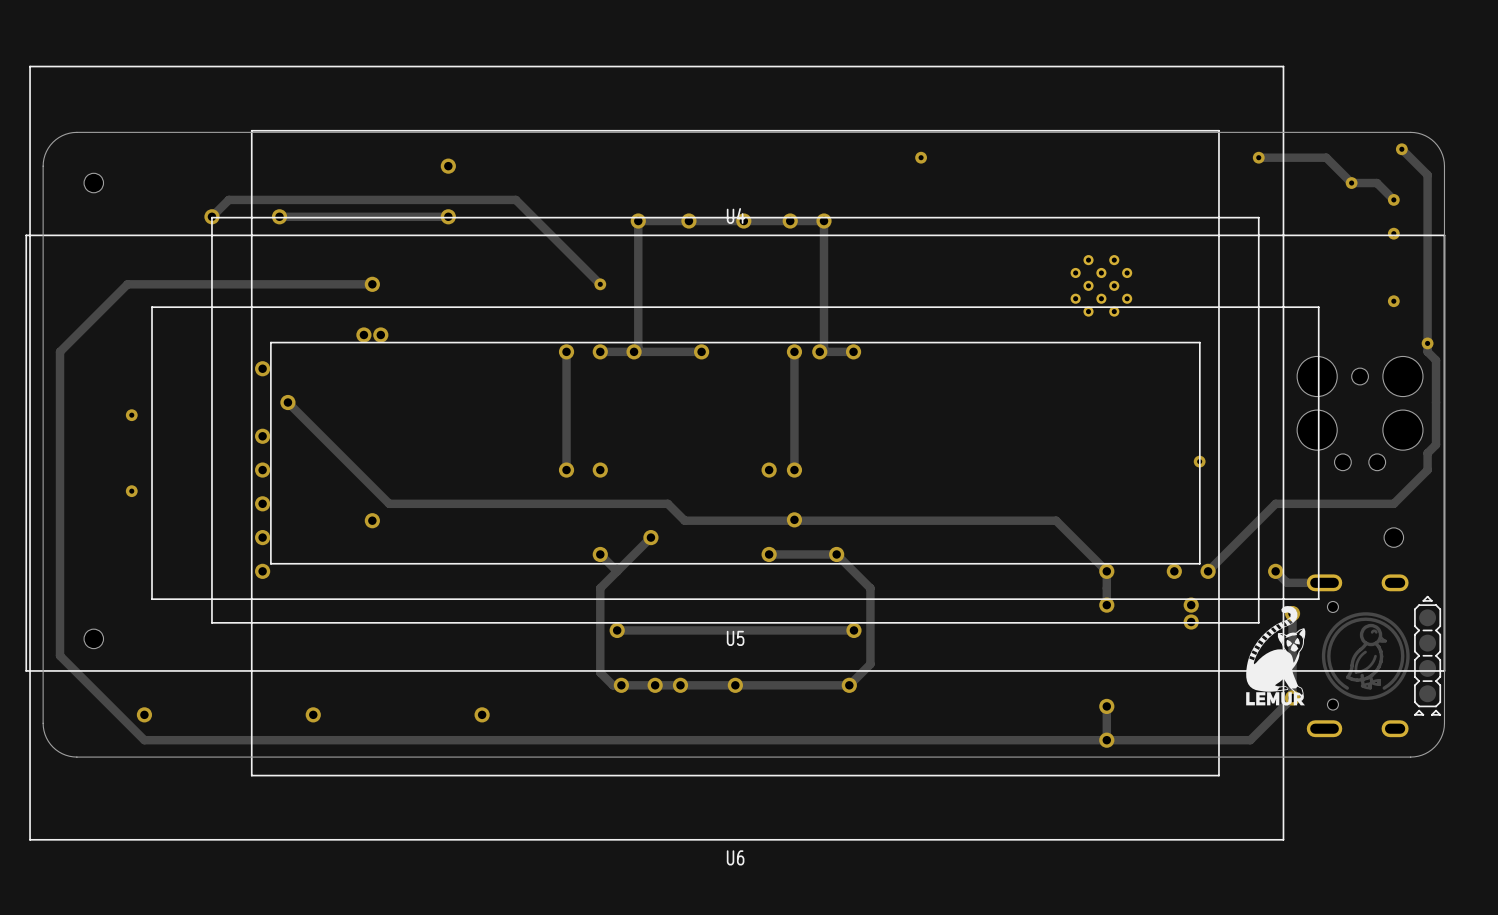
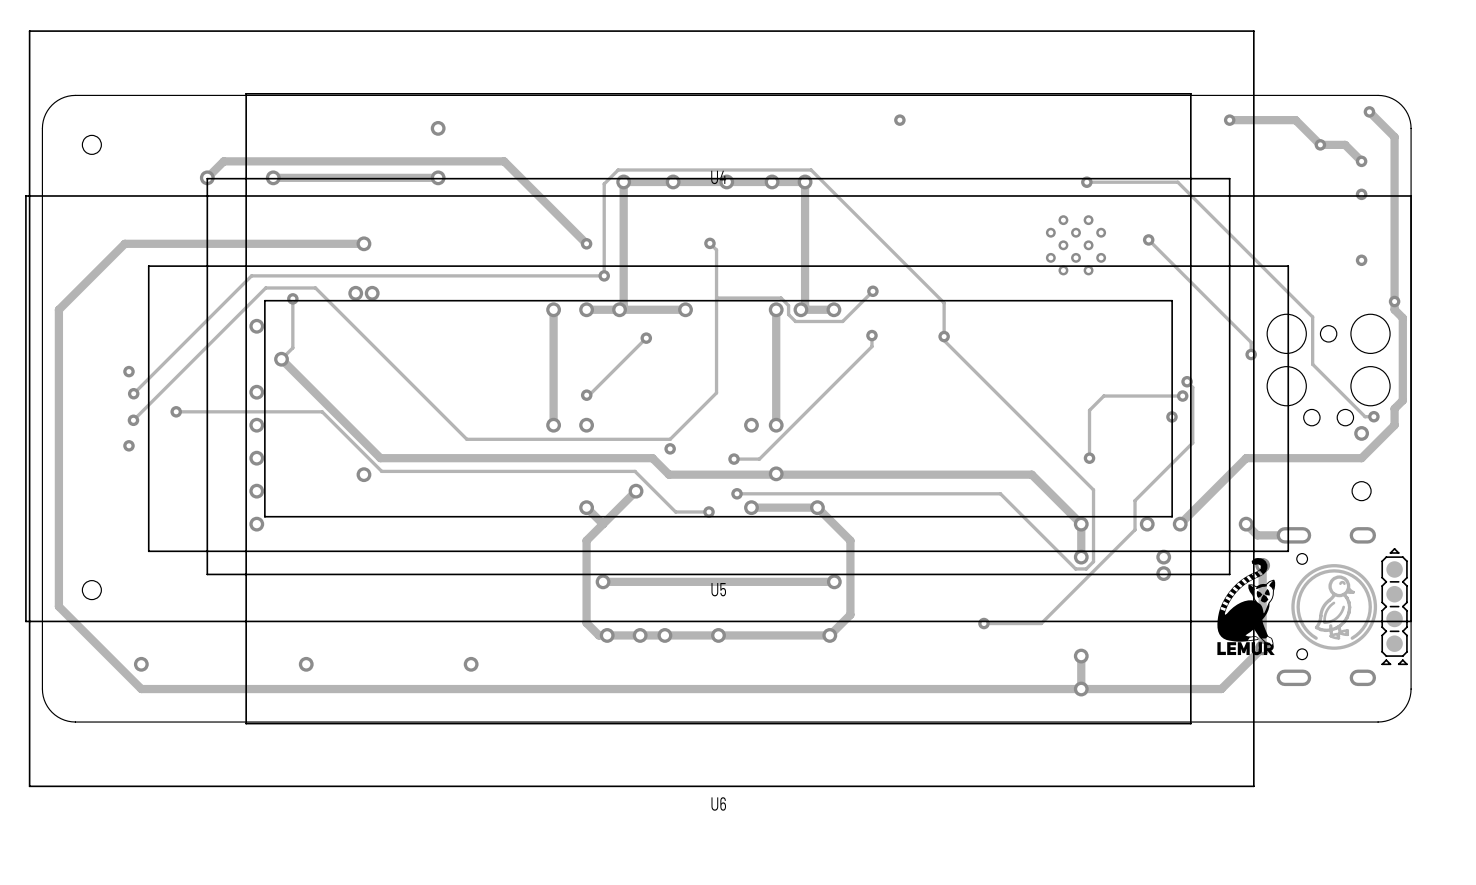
track: none -> (1086, 182) (1177, 182) (1312, 317) (1312, 364) (1365, 416) (1373, 416)
via: none -> (1086, 182)
track: none -> (1148, 239) (1251, 342) (1251, 354)
via: none -> (1148, 239)
track: none -> (709, 243) (716, 249) (716, 392) (670, 439) (466, 439) (315, 287) (265, 287) (133, 420)
via: none -> (709, 243)
via: none -> (604, 275)
track: none -> (872, 291) (842, 321) (795, 321) (788, 314) (788, 305) (781, 298) (716, 298)
via: none -> (872, 291)
track: none -> (292, 298) (292, 347) (281, 359)
via: none -> (292, 298)
track: none -> (871, 335) (871, 346) (759, 459) (734, 459)
via: none -> (871, 335)
via: none -> (944, 336)
track: none -> (646, 338) (589, 395) (586, 395)
via: none -> (646, 338)
via: none -> (1251, 354)
track: none -> (1187, 381) (1192, 387) (1192, 442) (1135, 500) (1135, 529) (1041, 623) (983, 623)
via: none -> (1187, 381)
track: none -> (133, 393) (251, 275) (604, 275) (604, 183) (618, 170) (811, 170) (944, 302) (944, 340) (1093, 489) (1093, 561) (1086, 568) (1075, 568) (1000, 493) (737, 493)
via: none -> (133, 393)
via: none -> (586, 395)
track: none -> (1182, 396) (1103, 396) (1089, 410) (1089, 458)
via: none -> (1182, 396)
track: none -> (176, 411) (322, 411) (381, 471) (635, 471) (675, 511) (709, 511)
via: none -> (176, 411)
via: none -> (1373, 416)
via: none -> (133, 420)
via: none -> (1361, 433)
via: none -> (670, 448)
via: none -> (1089, 458)
via: none -> (734, 459)
via: none -> (737, 493)
via: none -> (709, 511)
via: none -> (983, 623)
board edge: (1444, 723) (1442, 734) (1434, 747) (1421, 755) (1410, 757) (76, 757) (65, 755) (53, 747) (45, 734) (43, 723) -> (1411, 672) (1410, 692) (1406, 706) (1392, 718) (1378, 722) (75, 722) (61, 718) (47, 706) (42, 692) (42, 672)

